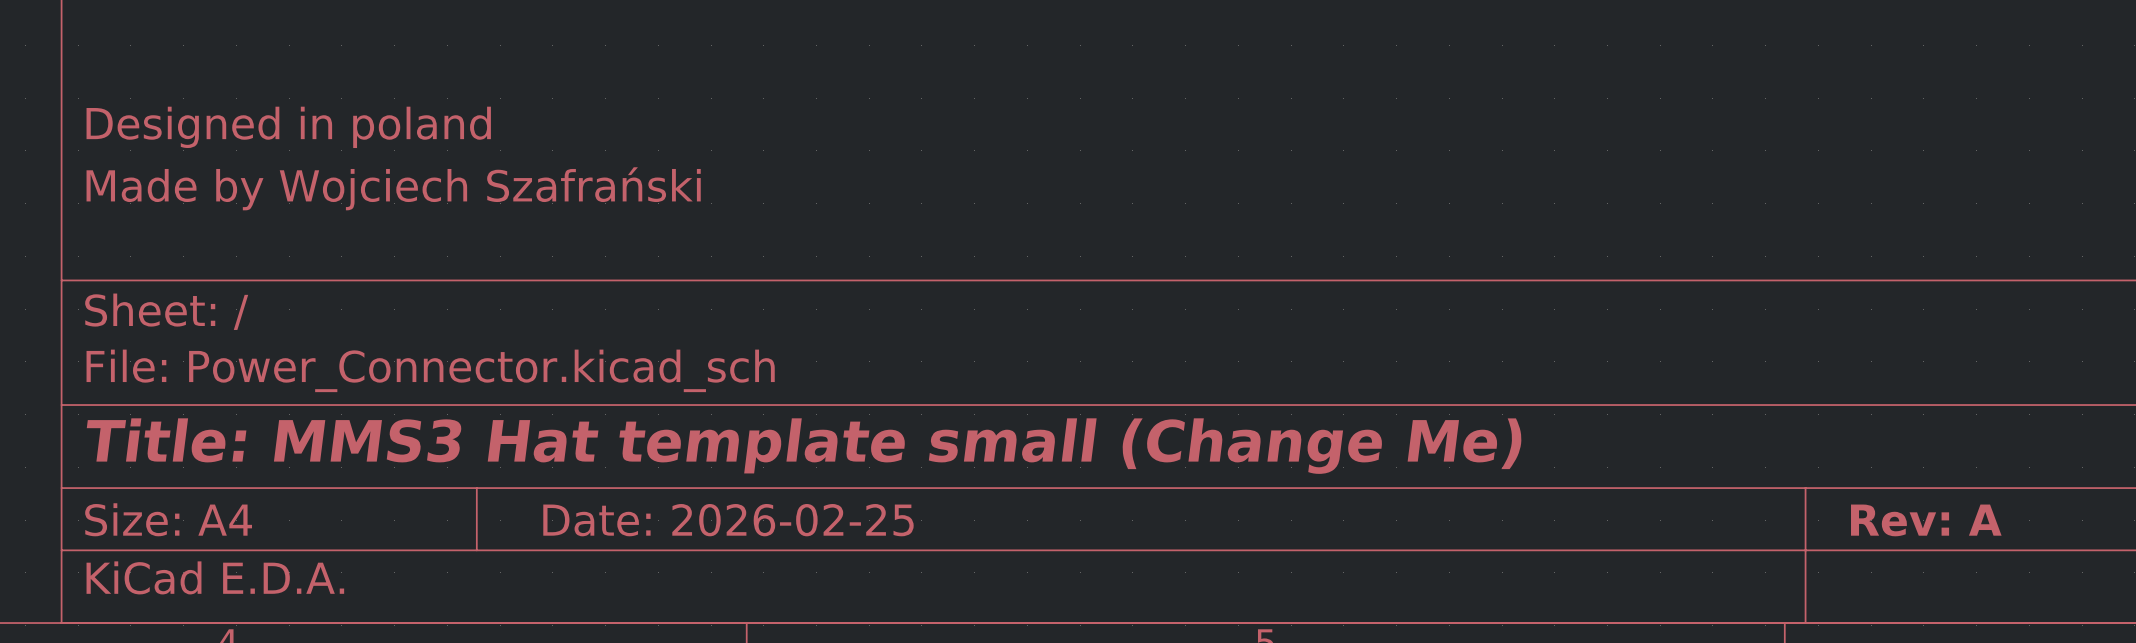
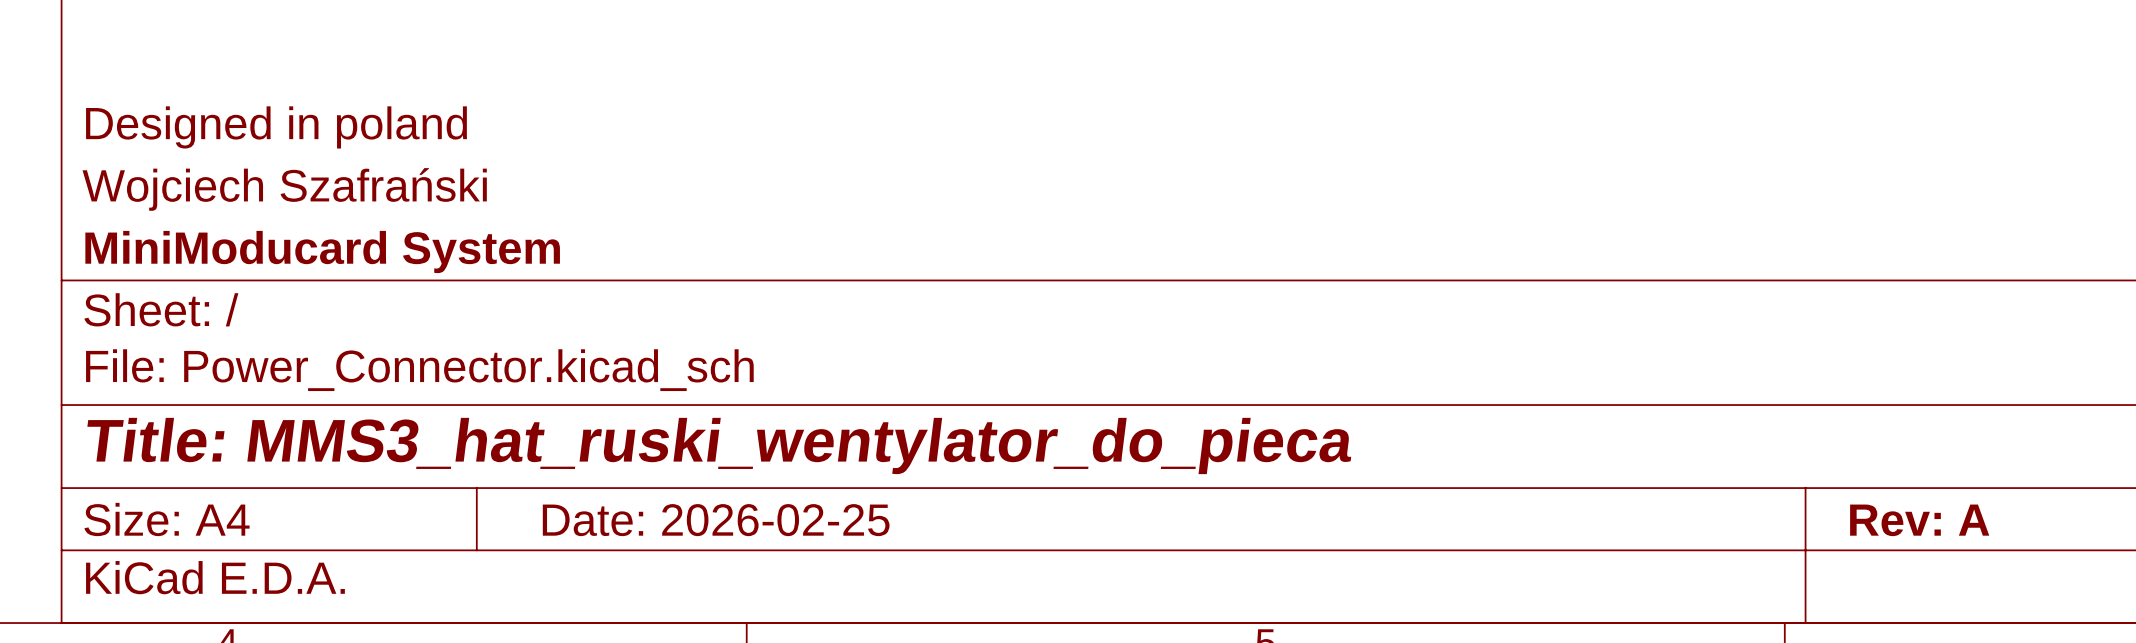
title block: Made by Wojciech Szafrański (393, 188) -> Wojciech Szafrański (284, 189)
title block: none -> MiniModucard System (322, 252)
title block: Title: MMS3 Hat template small (Change Me) (804, 446) -> Title: MMS3_hat_ruski_wentylator_do_pieca (719, 445)

